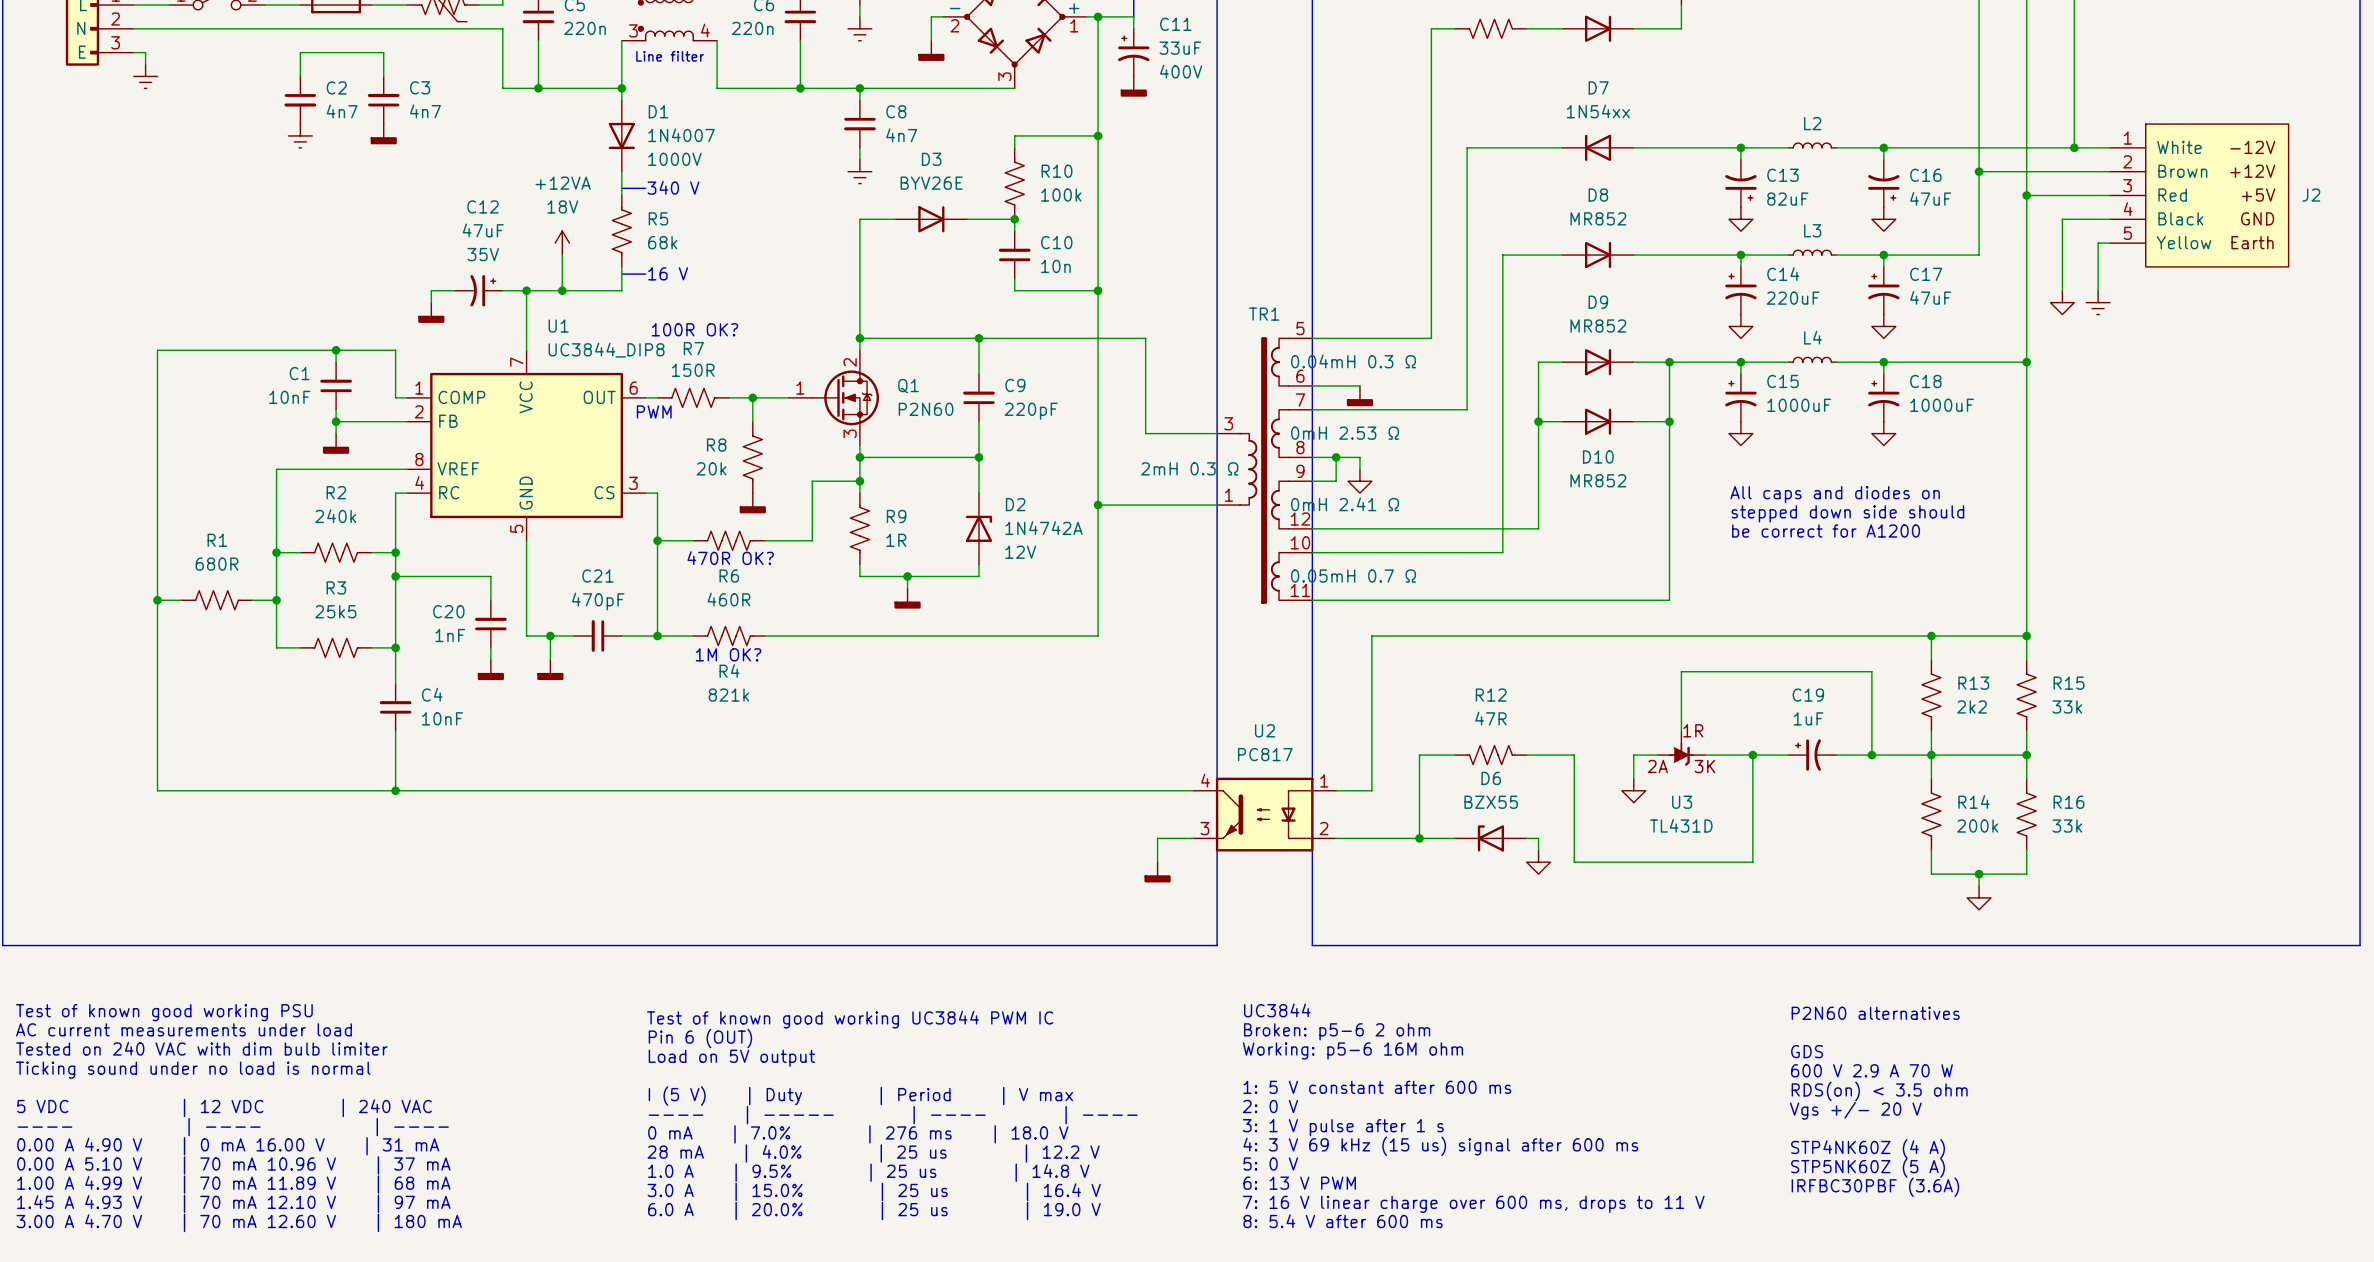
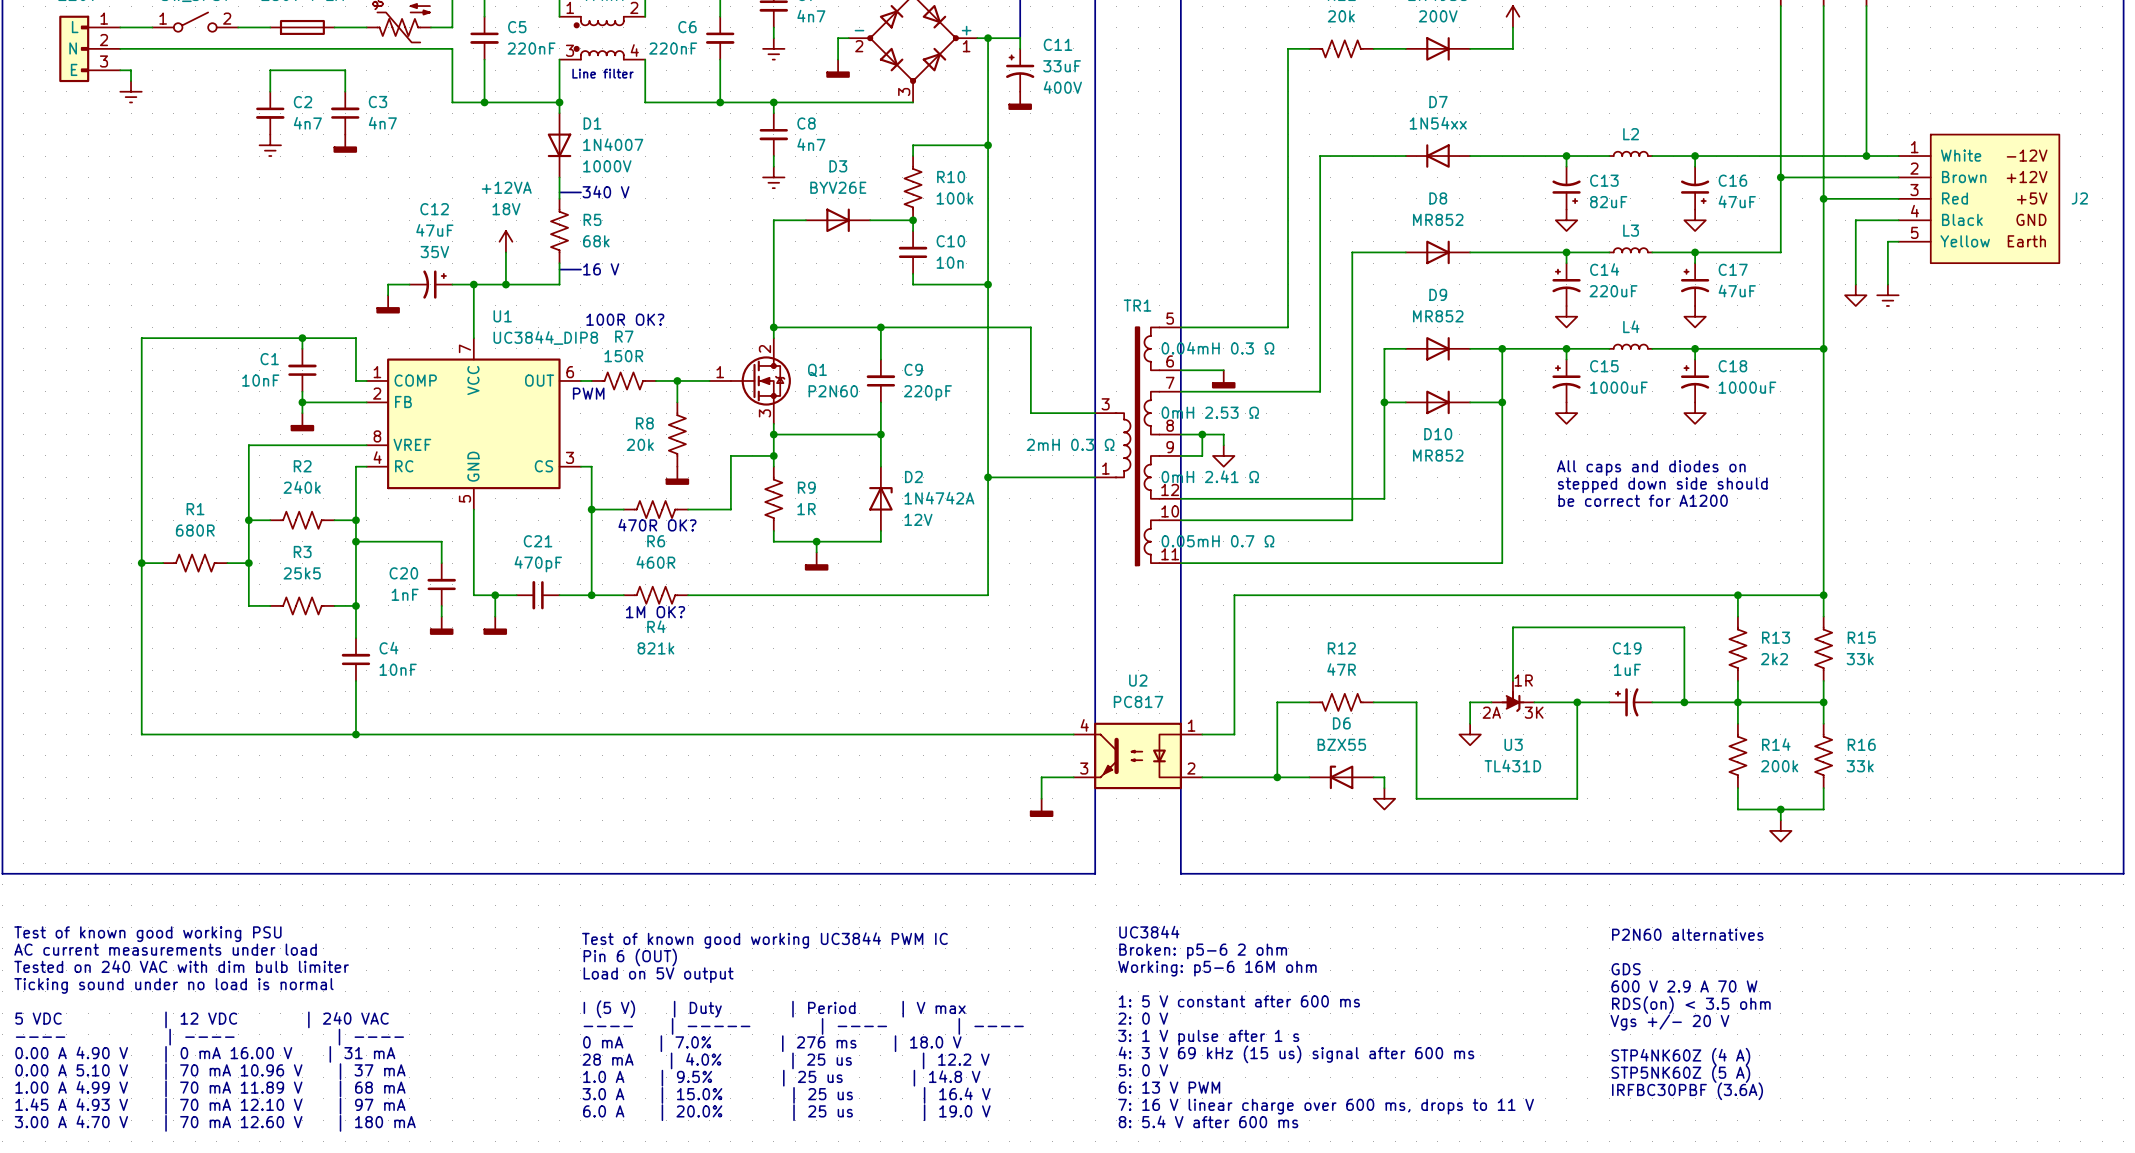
C5 value: 220n (585, 28) -> 220nF (531, 48)
C6 value: 220n (752, 28) -> 220nF (673, 48)

